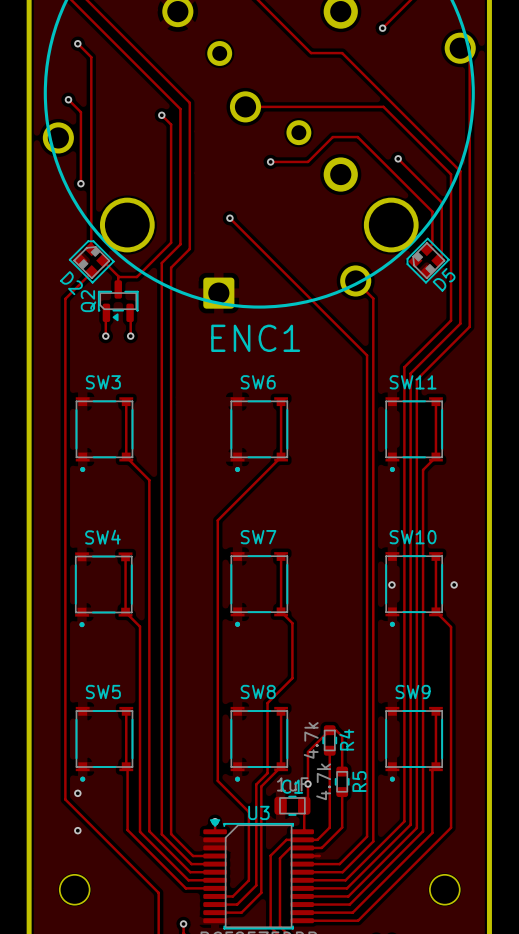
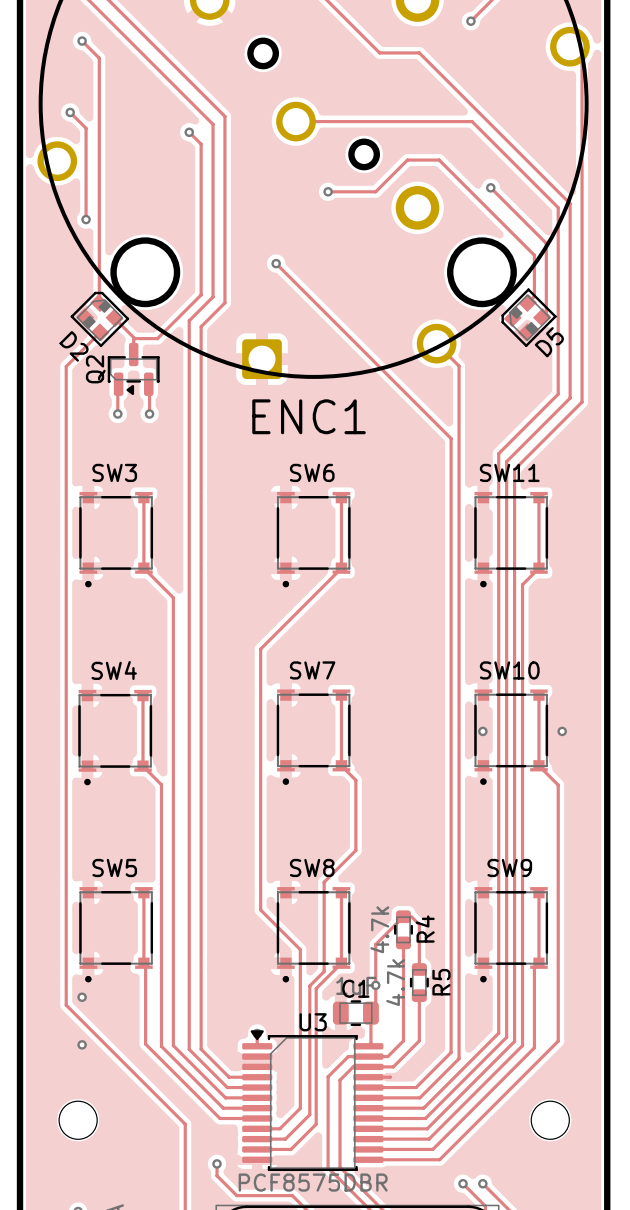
track: (217, 724) (217, 780) (248, 812) -> (260, 909) (300, 949) (300, 1021)

